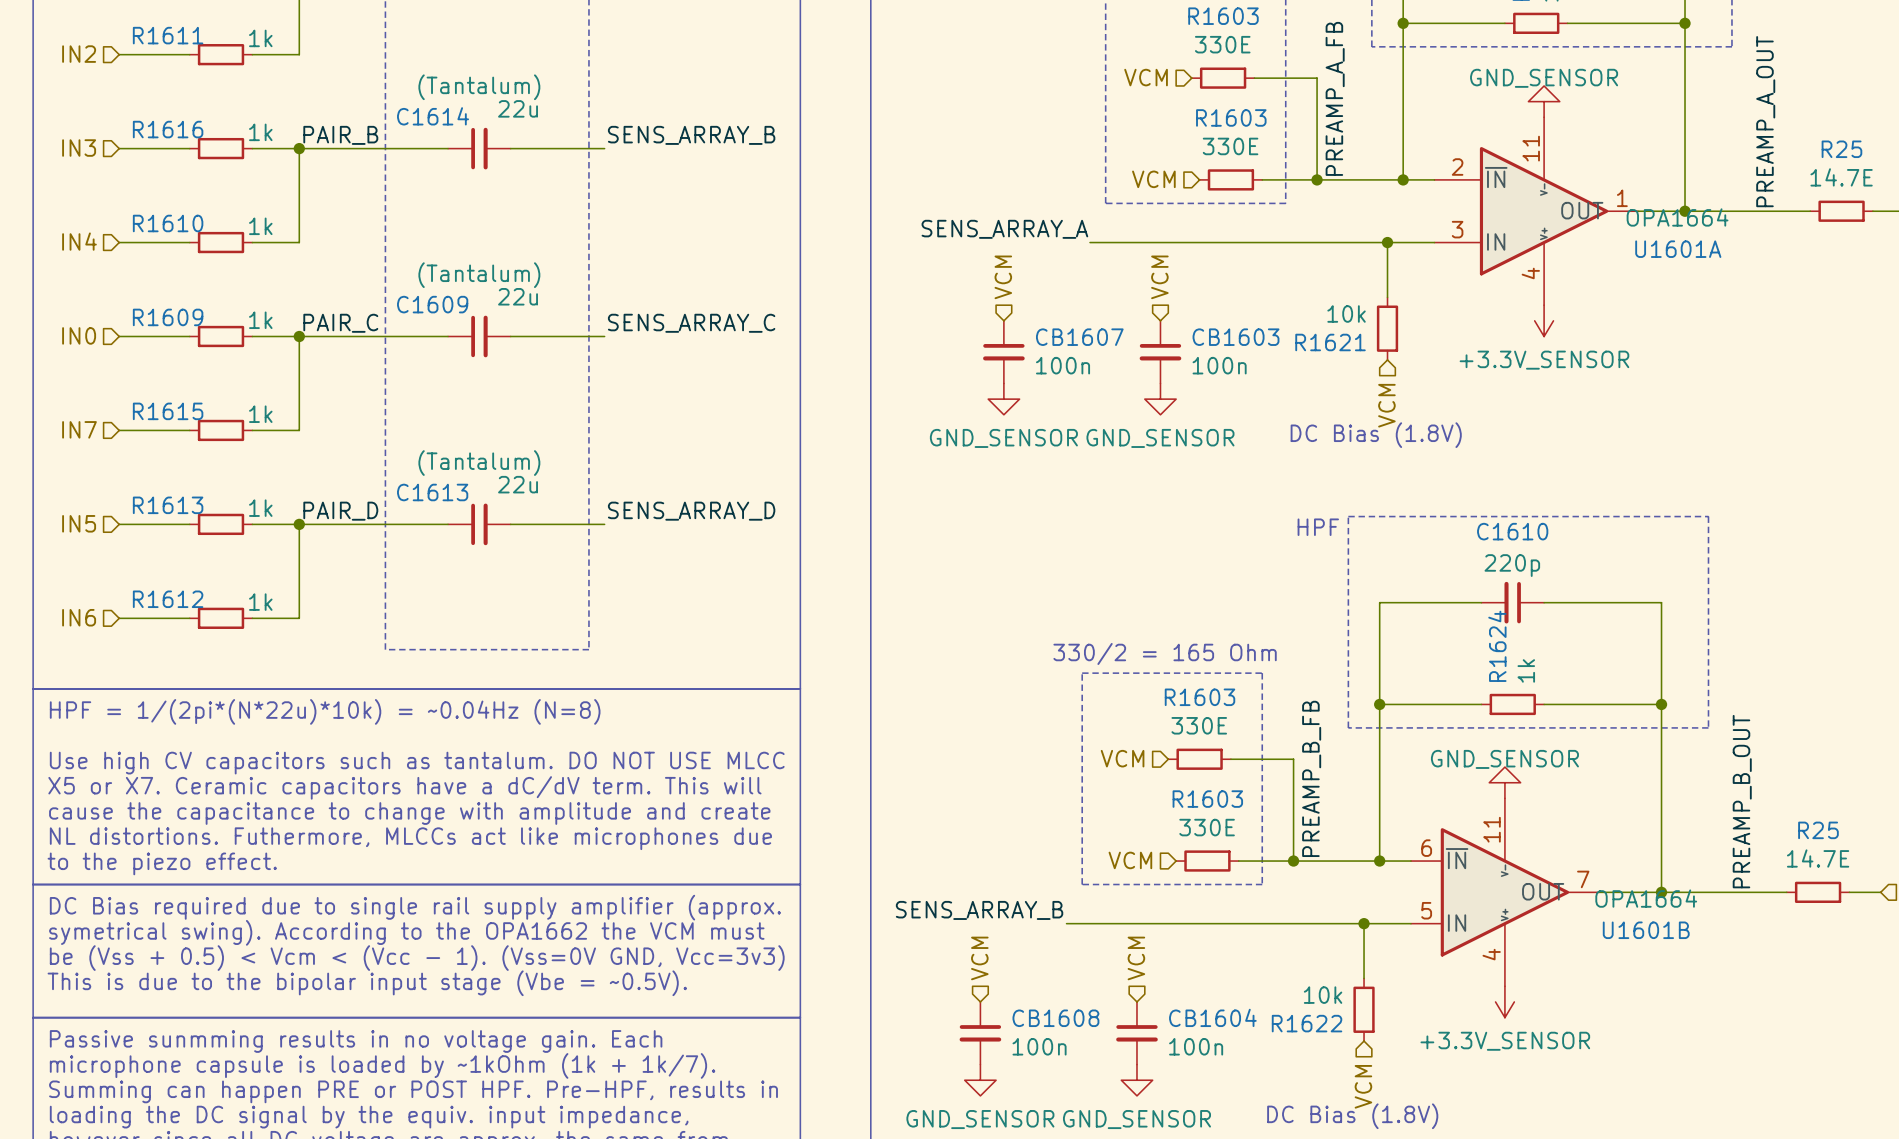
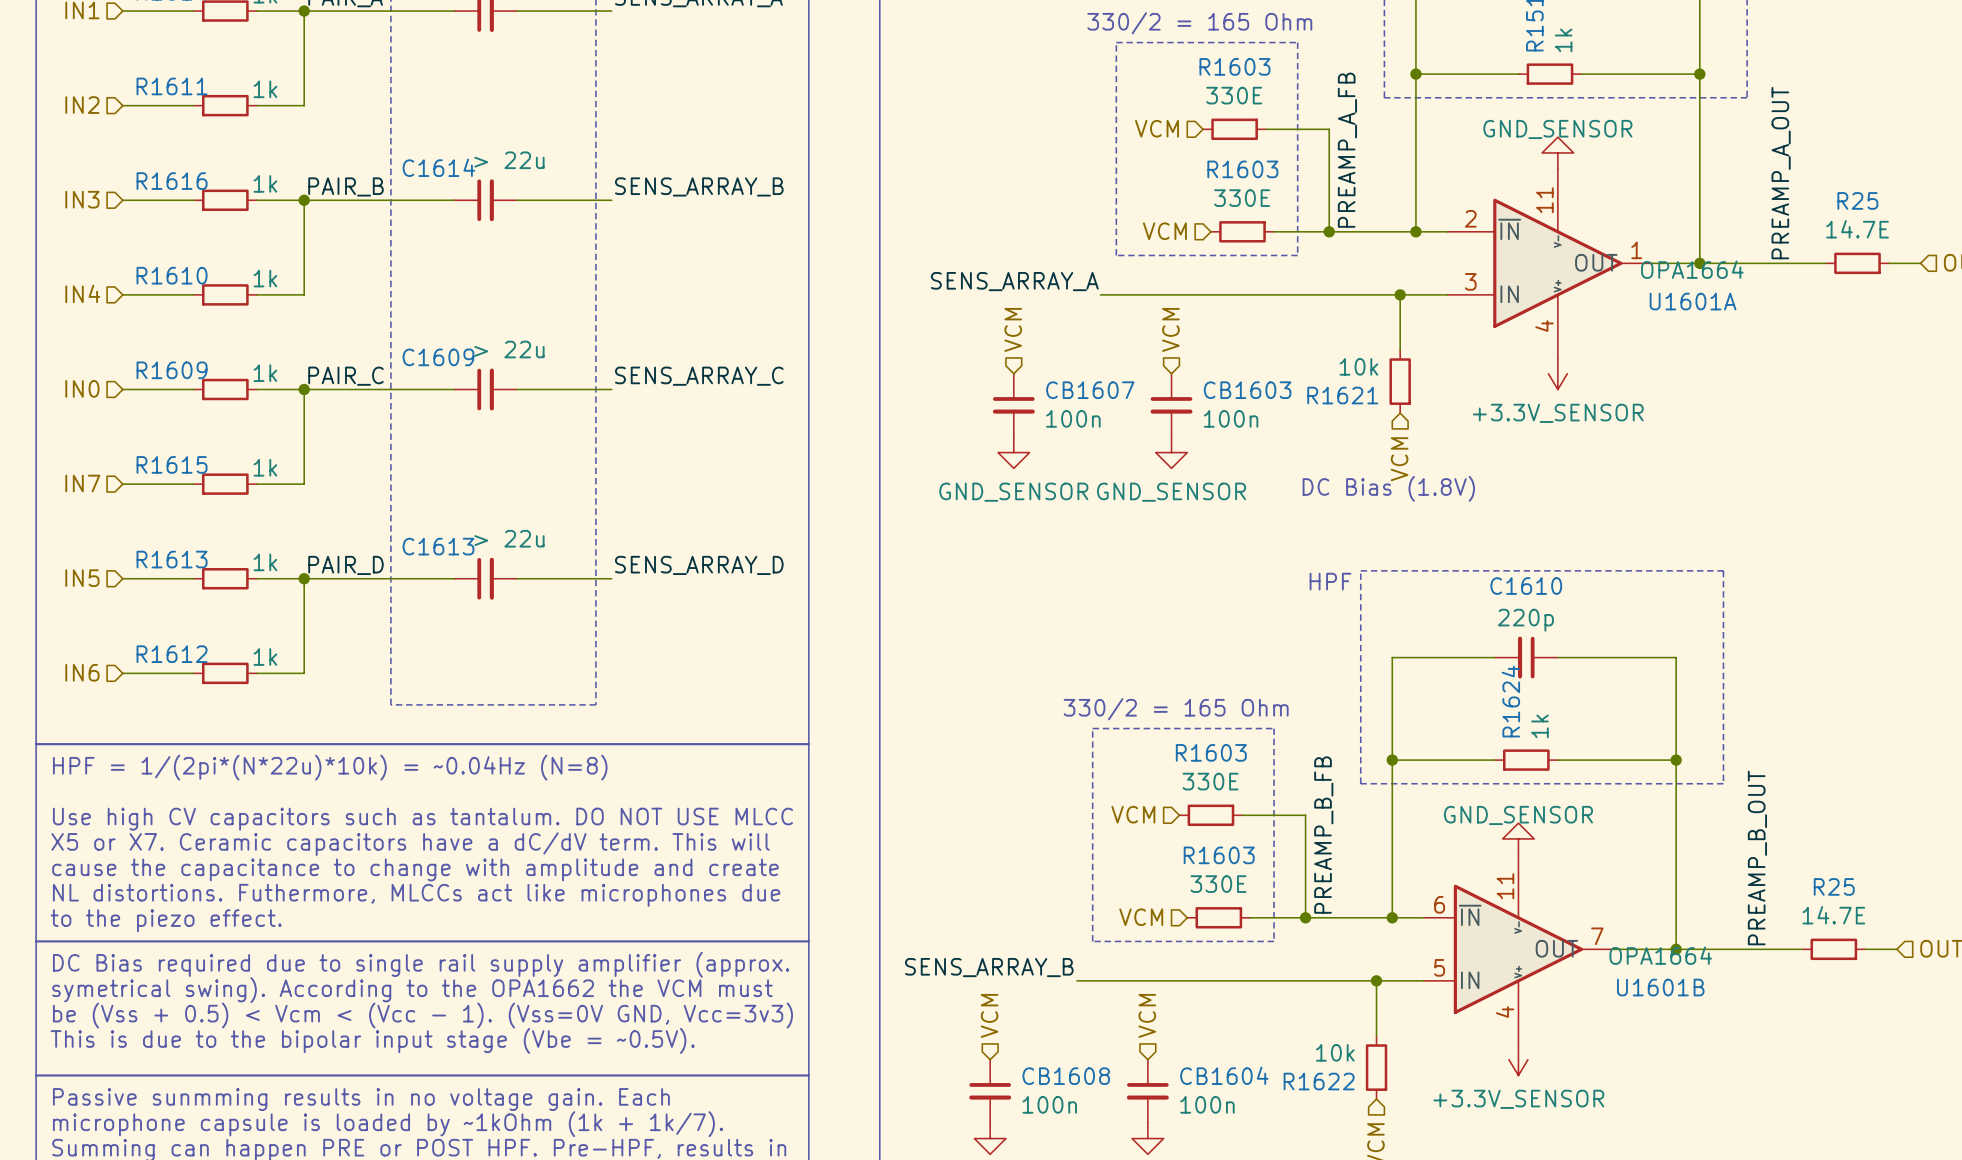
C1614 text: (Tantalum) (479, 87) -> none
C1614 value: 22u (518, 108) -> > 22u (509, 160)
C1609 text: (Tantalum) (479, 275) -> none
C1609 value: 22u (518, 296) -> > 22u (509, 349)
C1613 text: (Tantalum) (479, 463) -> none
C1613 value: 22u (518, 484) -> > 22u (509, 538)

